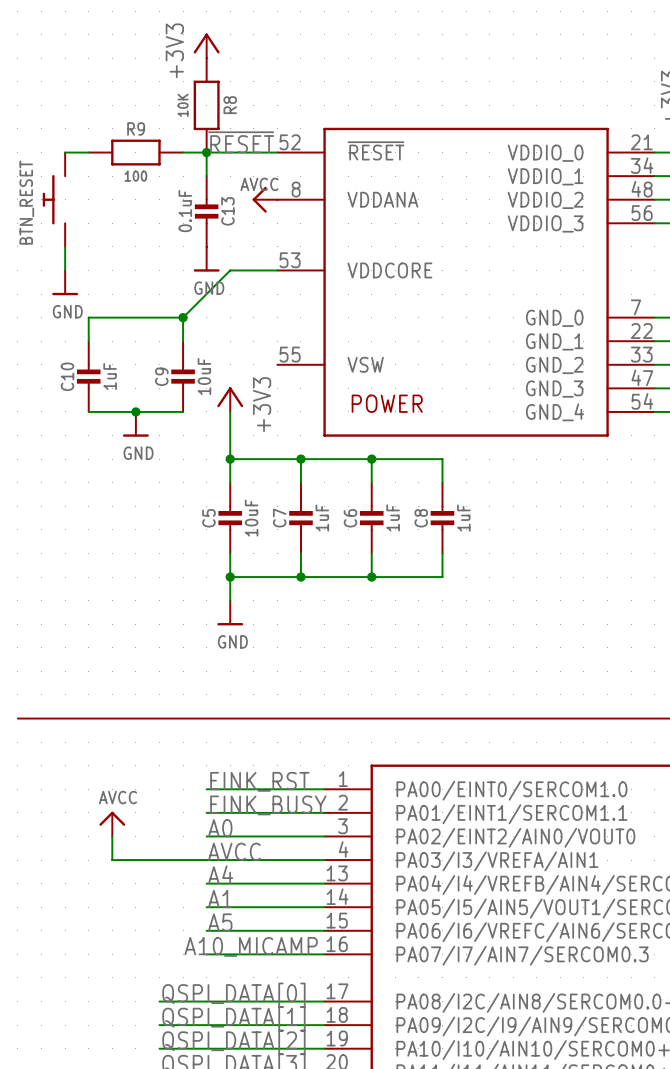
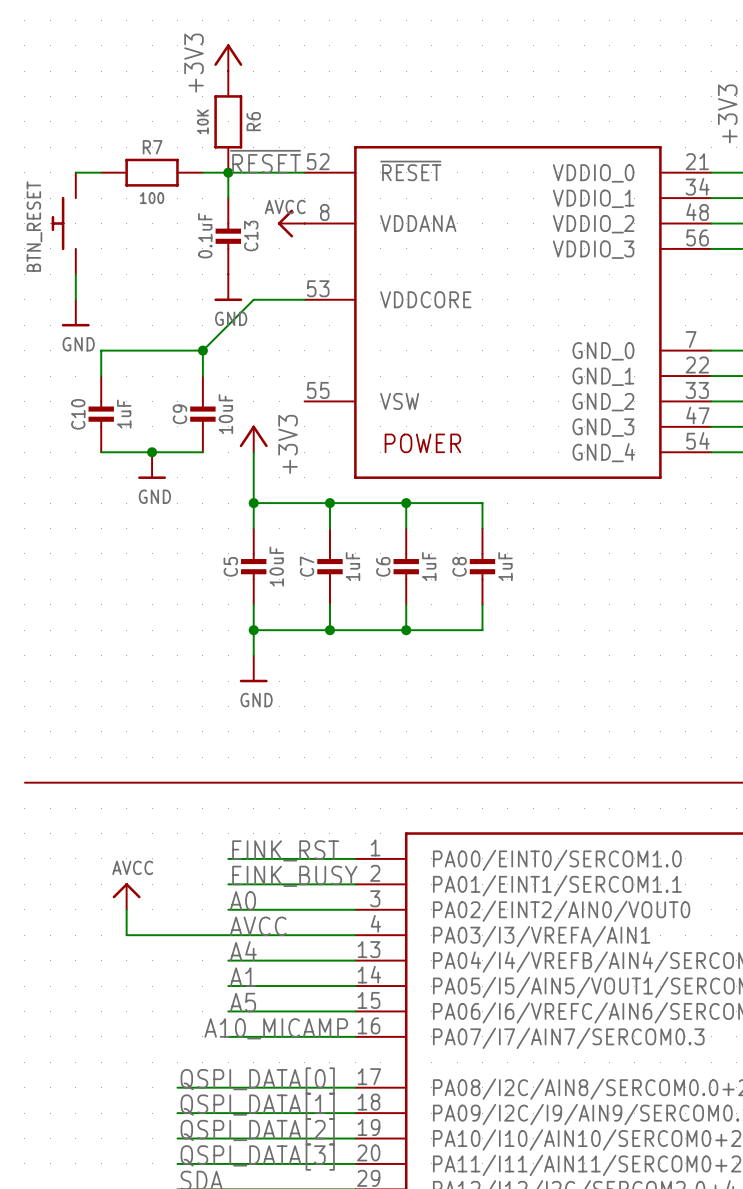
R8 name: R8 (230, 105) -> R6 (253, 121)
R9 name: R9 (136, 128) -> R7 (152, 147)

